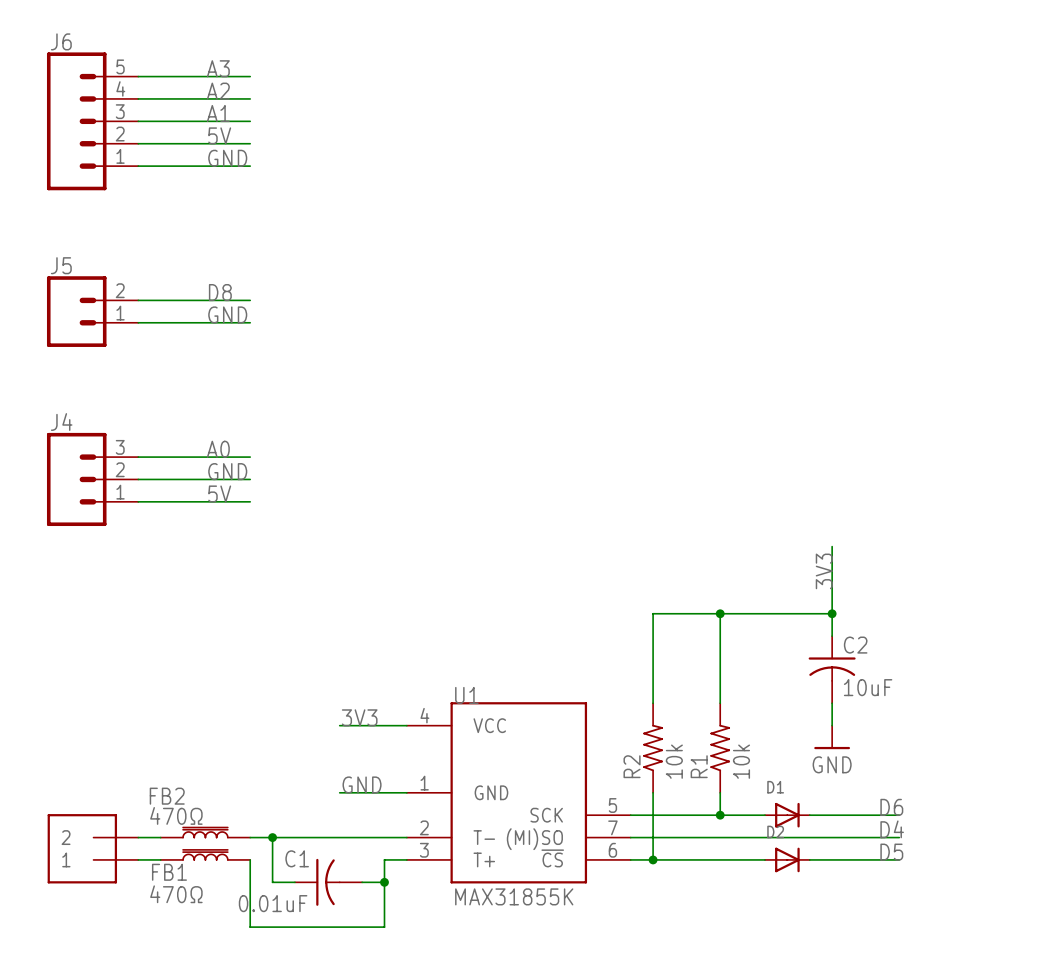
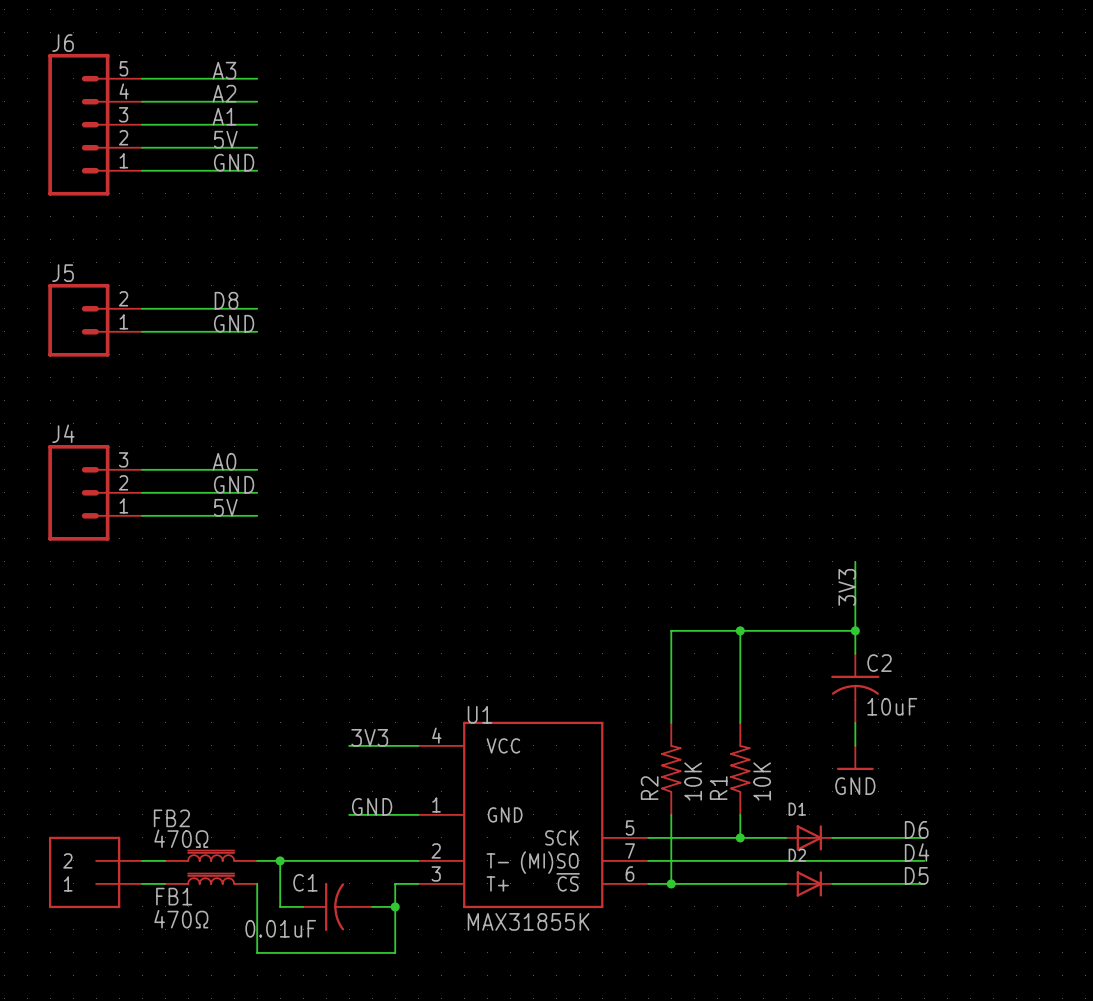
R2 value: 10k (674, 761) -> 10K (693, 781)
R1 value: 10k (741, 761) -> 10K (762, 781)

